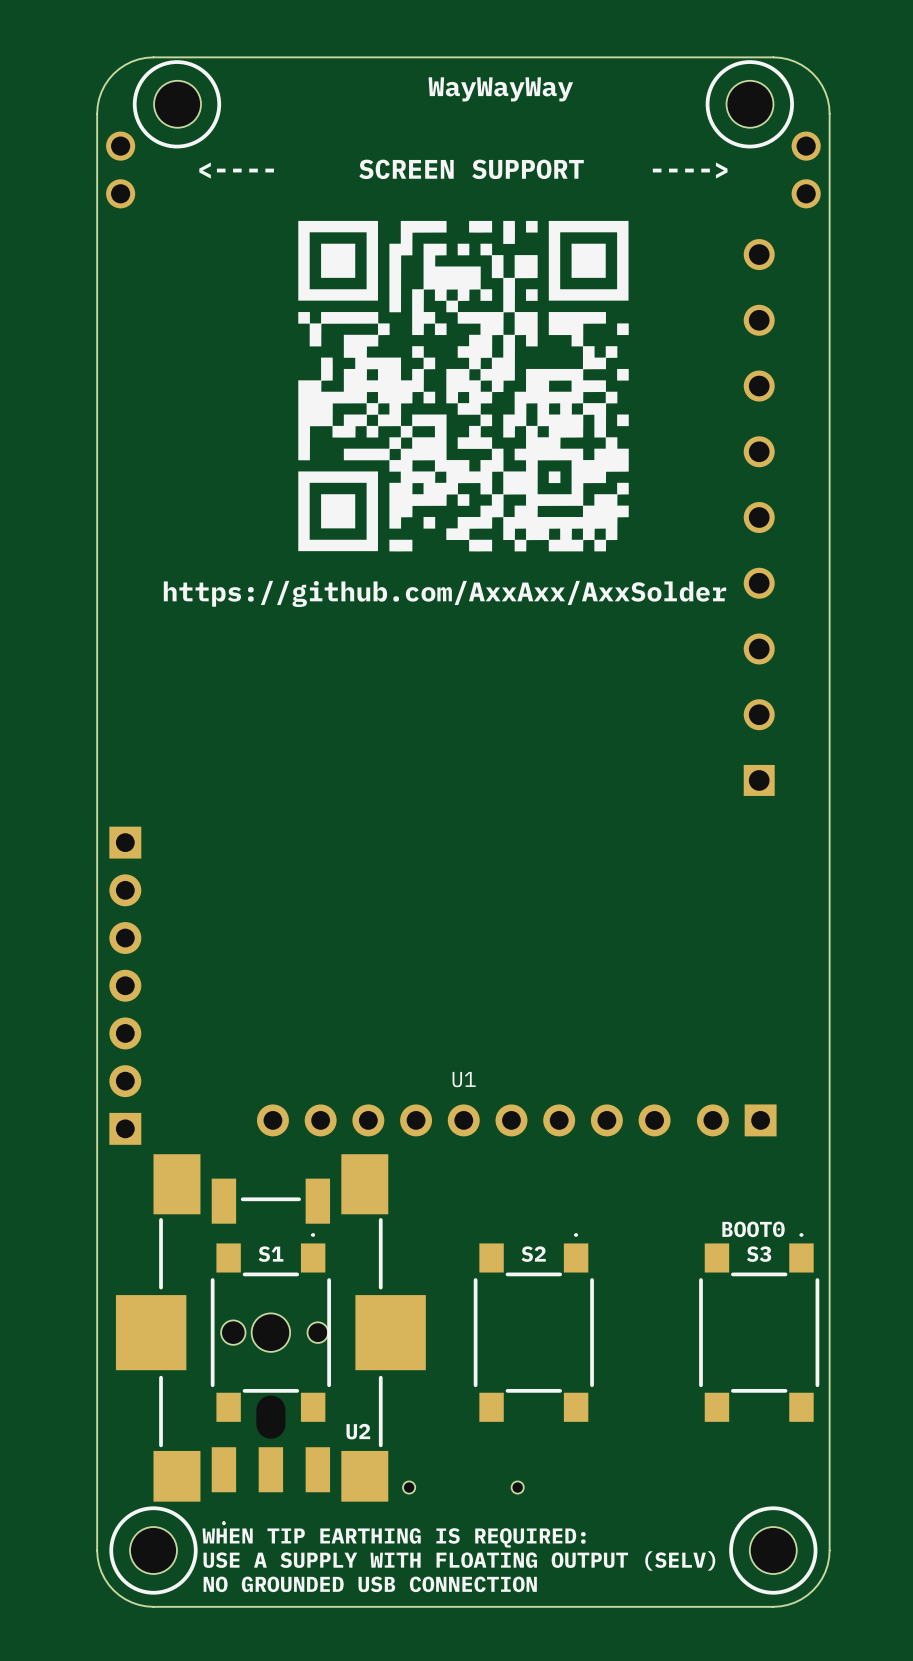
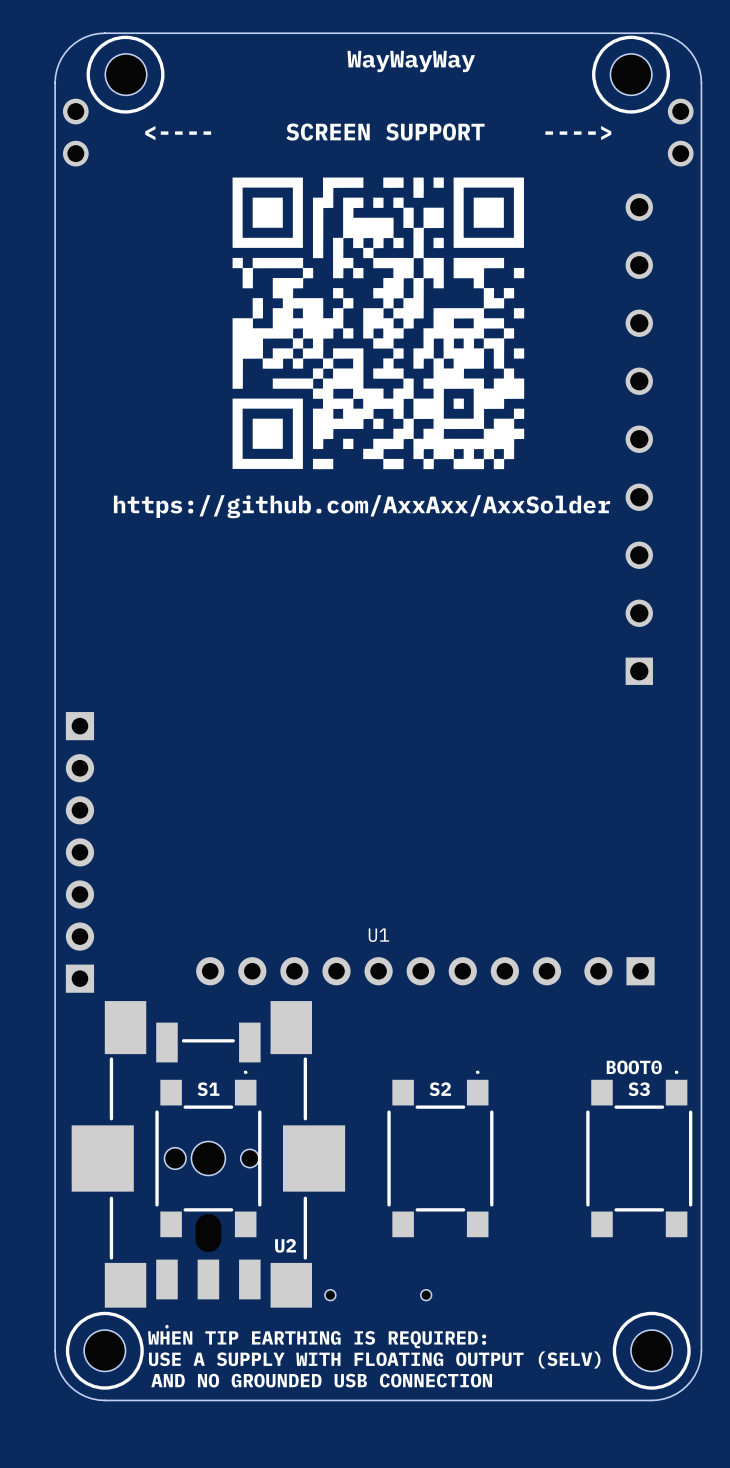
text: NO GROUNDED USB CONNECTION (370, 1584) -> AND NO GROUNDED USB CONNECTION (321, 1380)

